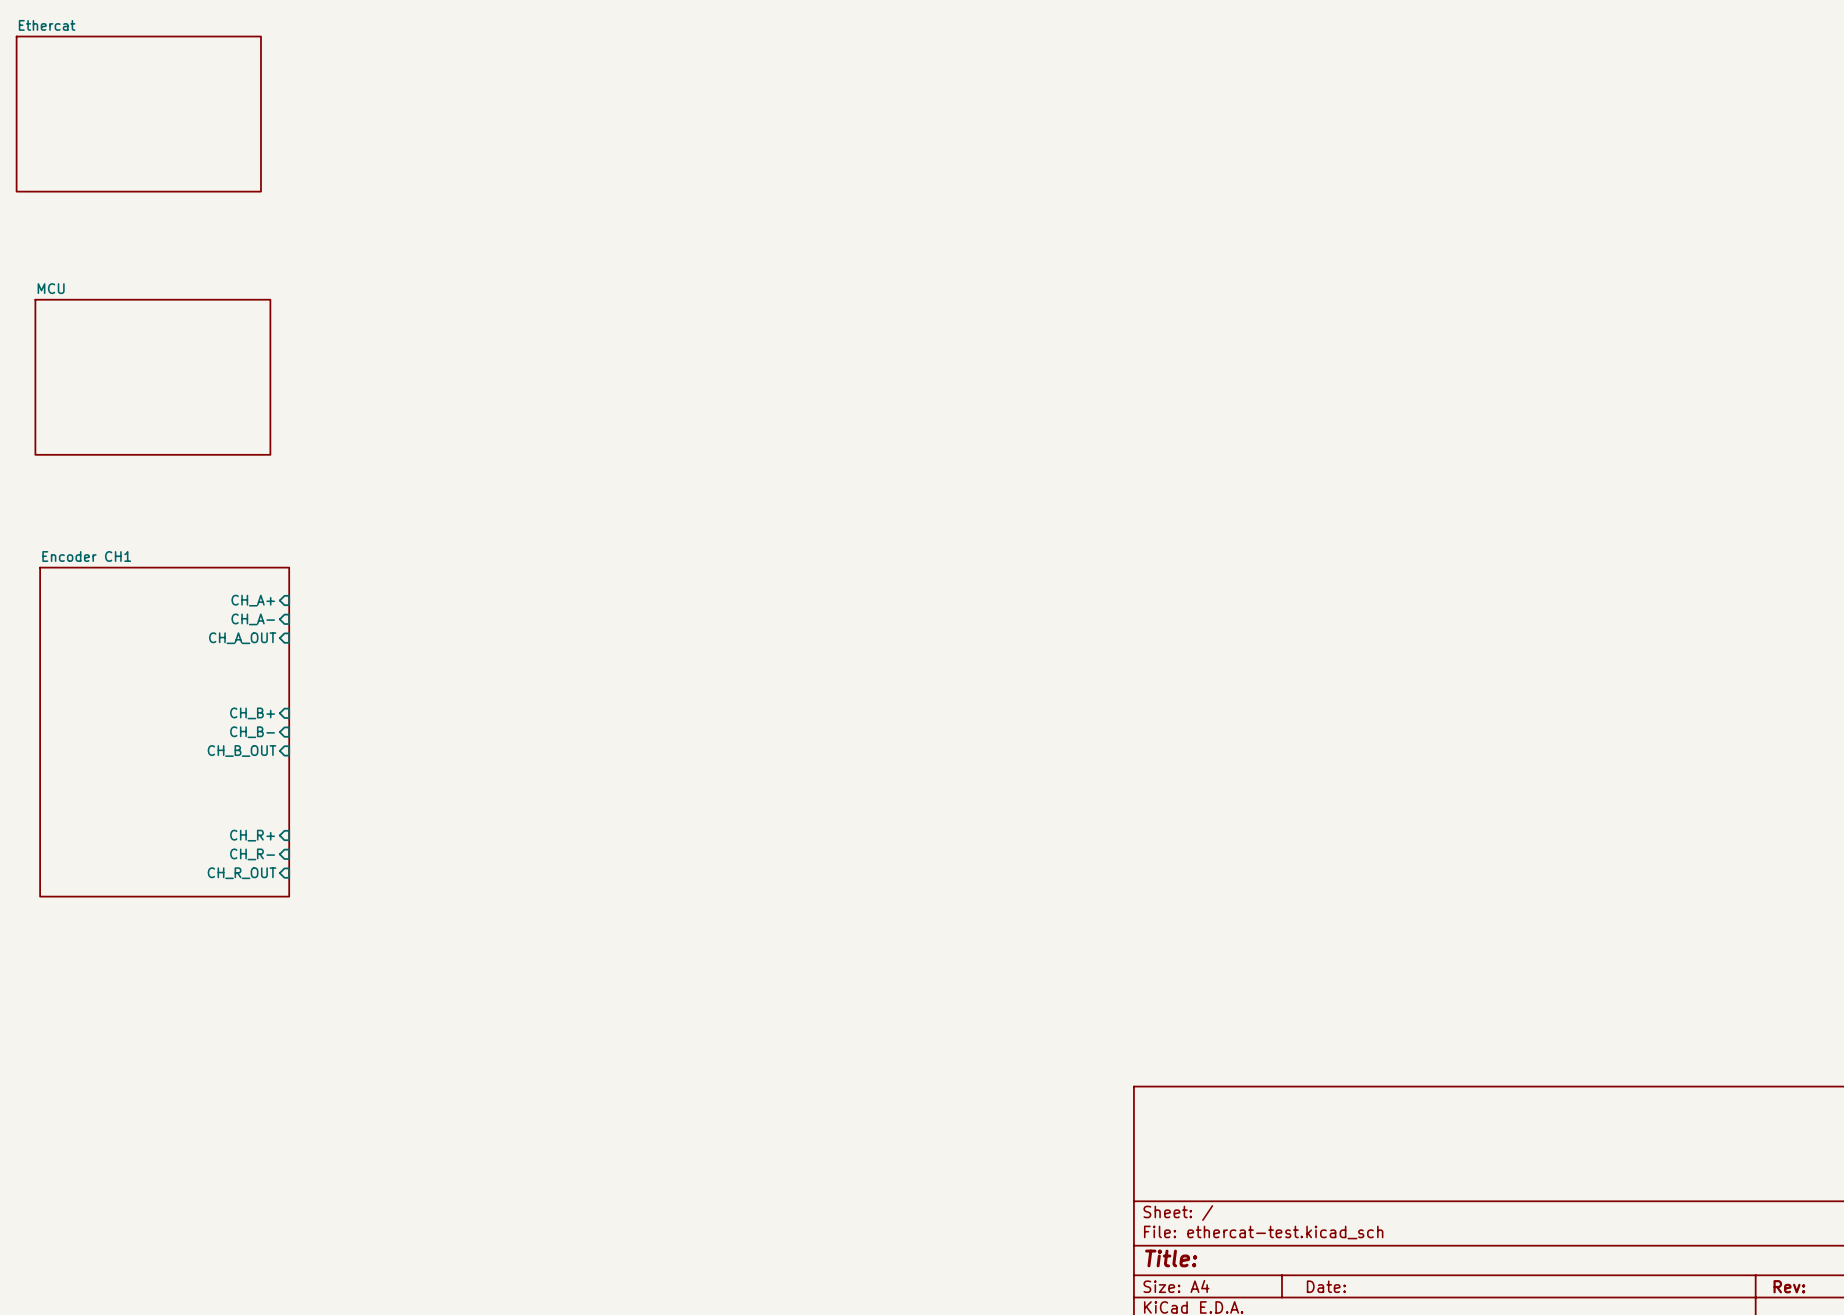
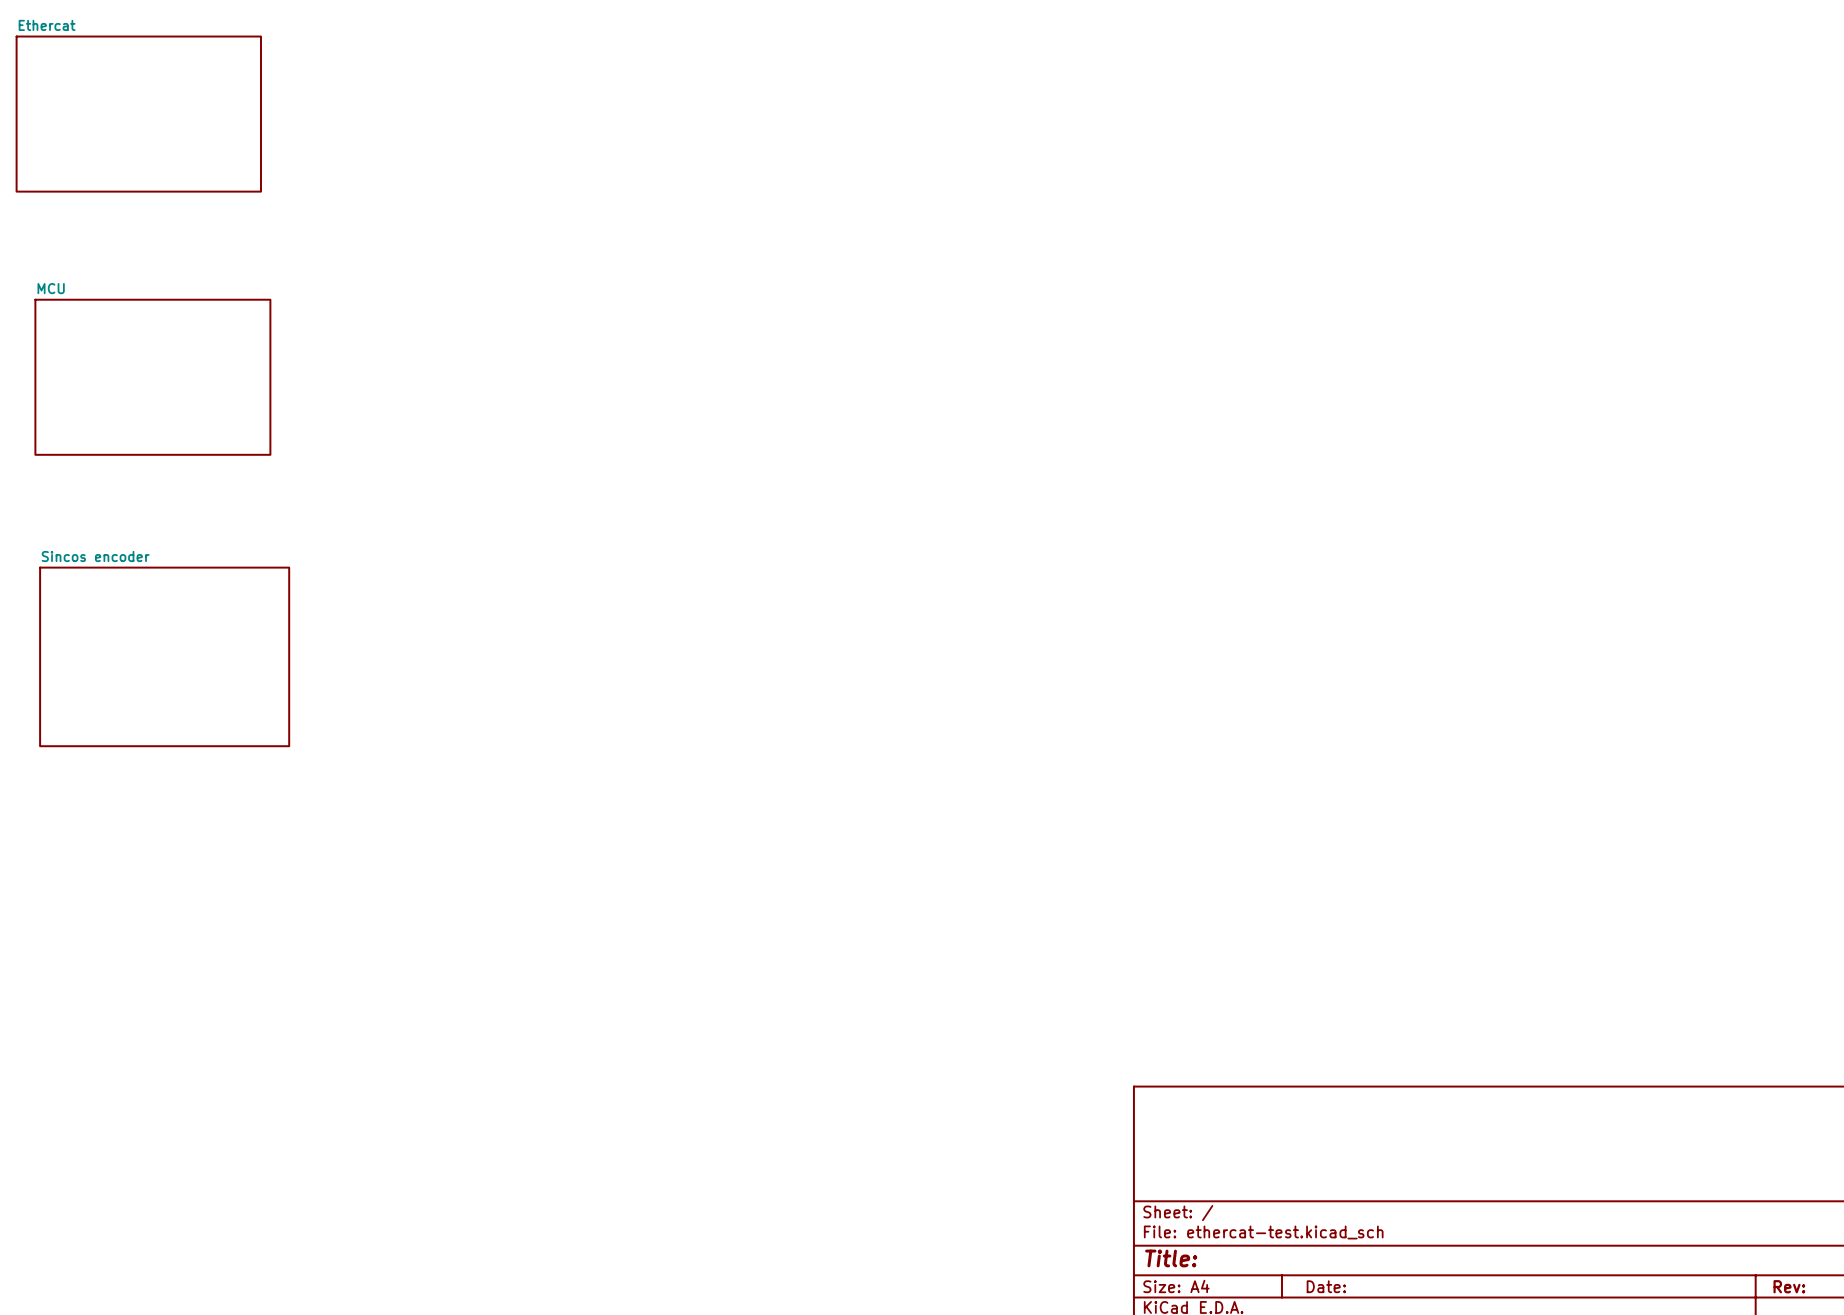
sheet pin: CH_A+ (253, 600) -> none
sheet pin: CH_A- (253, 619) -> none
sheet pin: CH_A_OUT (242, 638) -> none
sheet Sincos encoder: none -> (164, 656)
sheet pin: CH_B+ (252, 713) -> none
sheet Encoder CH1: (164, 732) -> none
sheet pin: CH_B- (252, 732) -> none
sheet pin: CH_B_OUT (242, 751) -> none
sheet pin: CH_R+ (252, 835) -> none
sheet pin: CH_R- (252, 854) -> none
sheet pin: CH_R_OUT (242, 873) -> none

